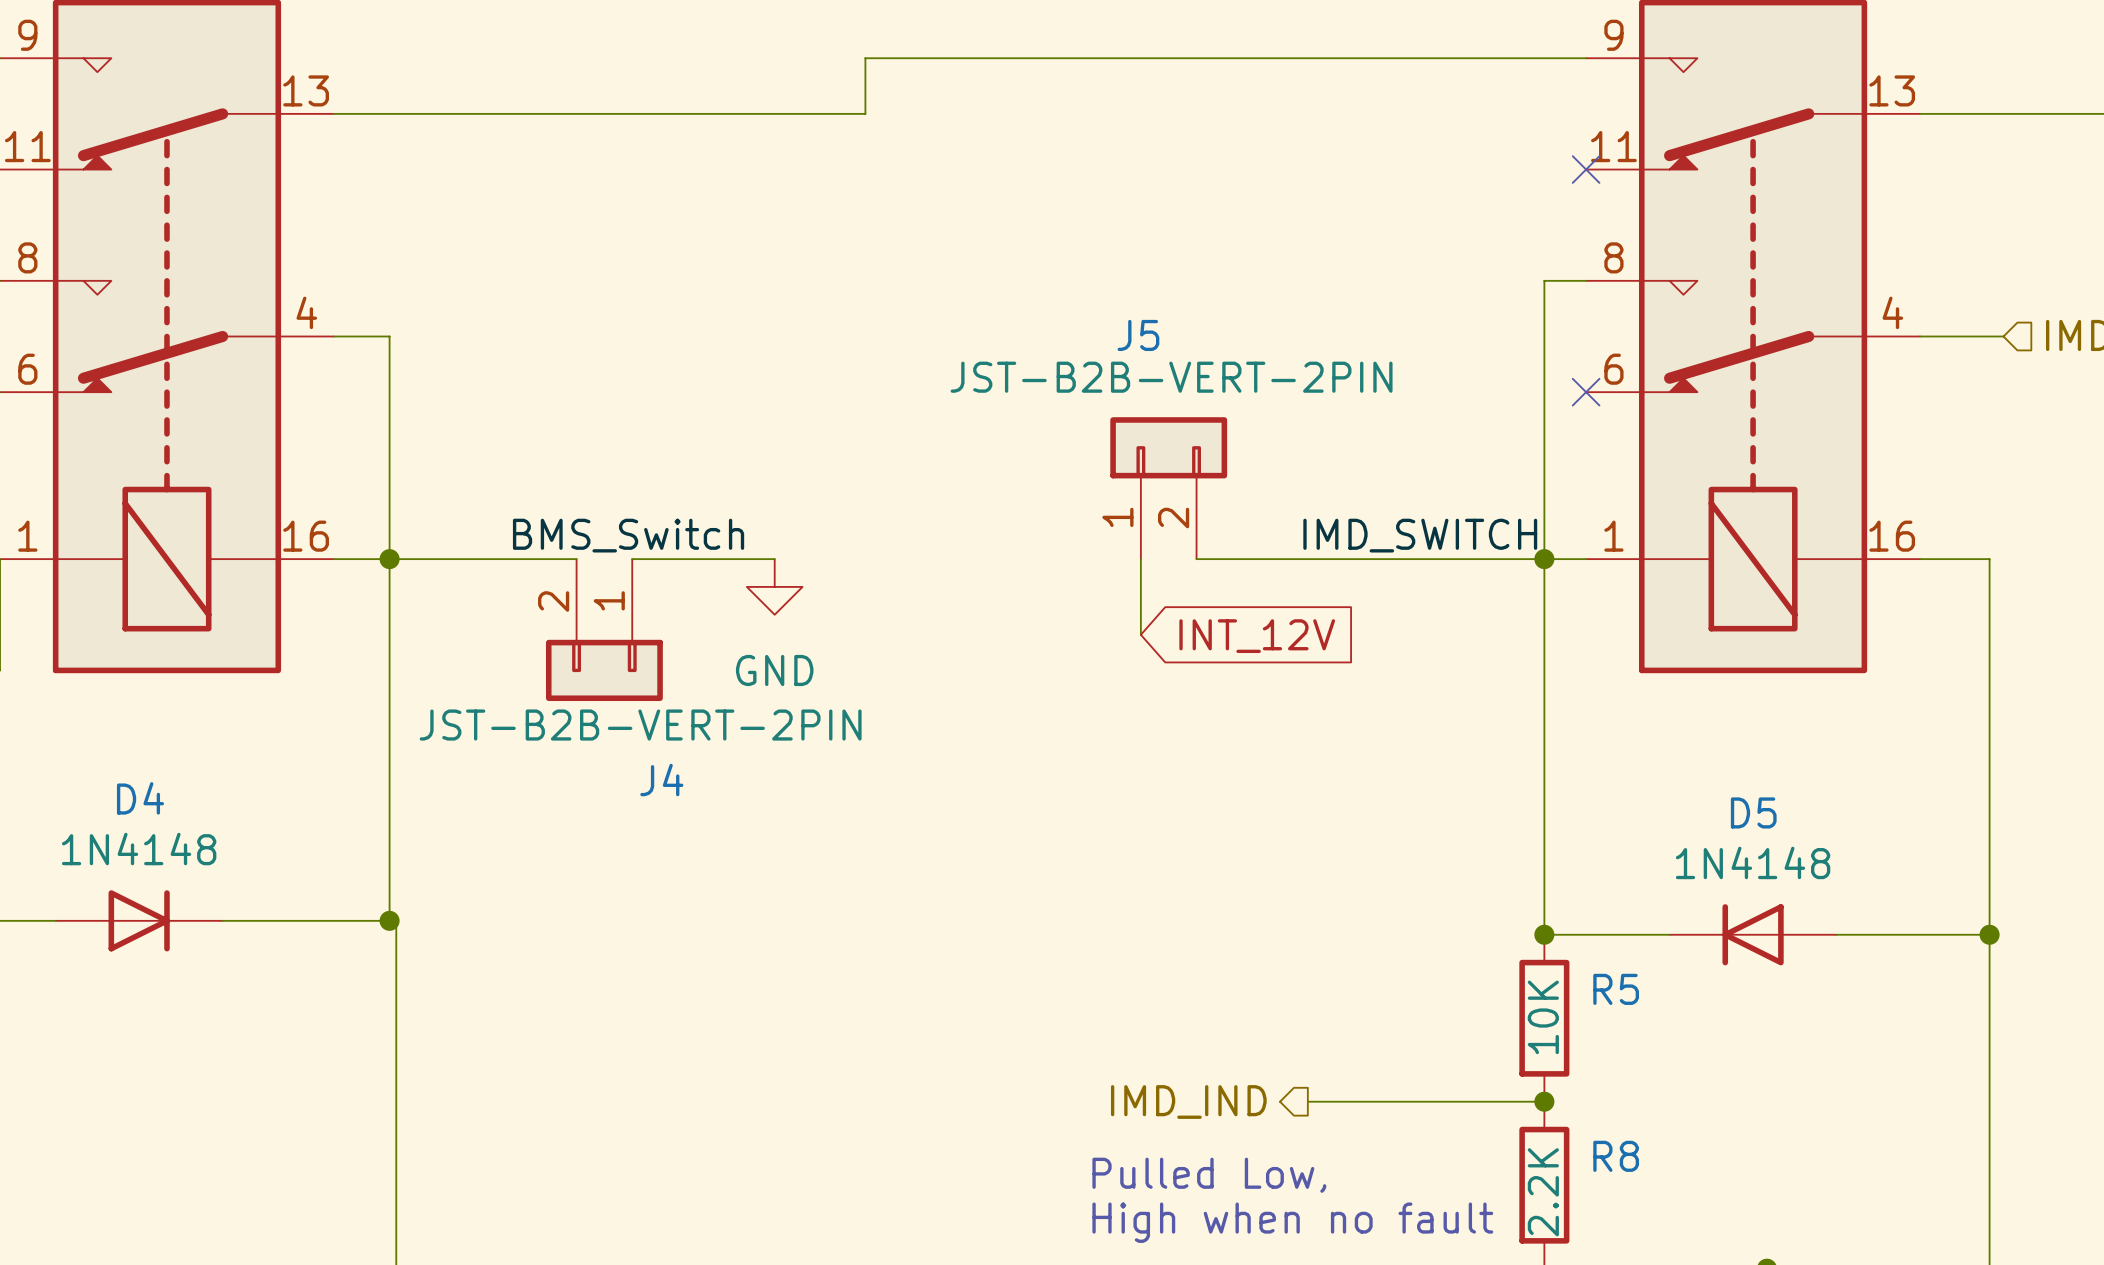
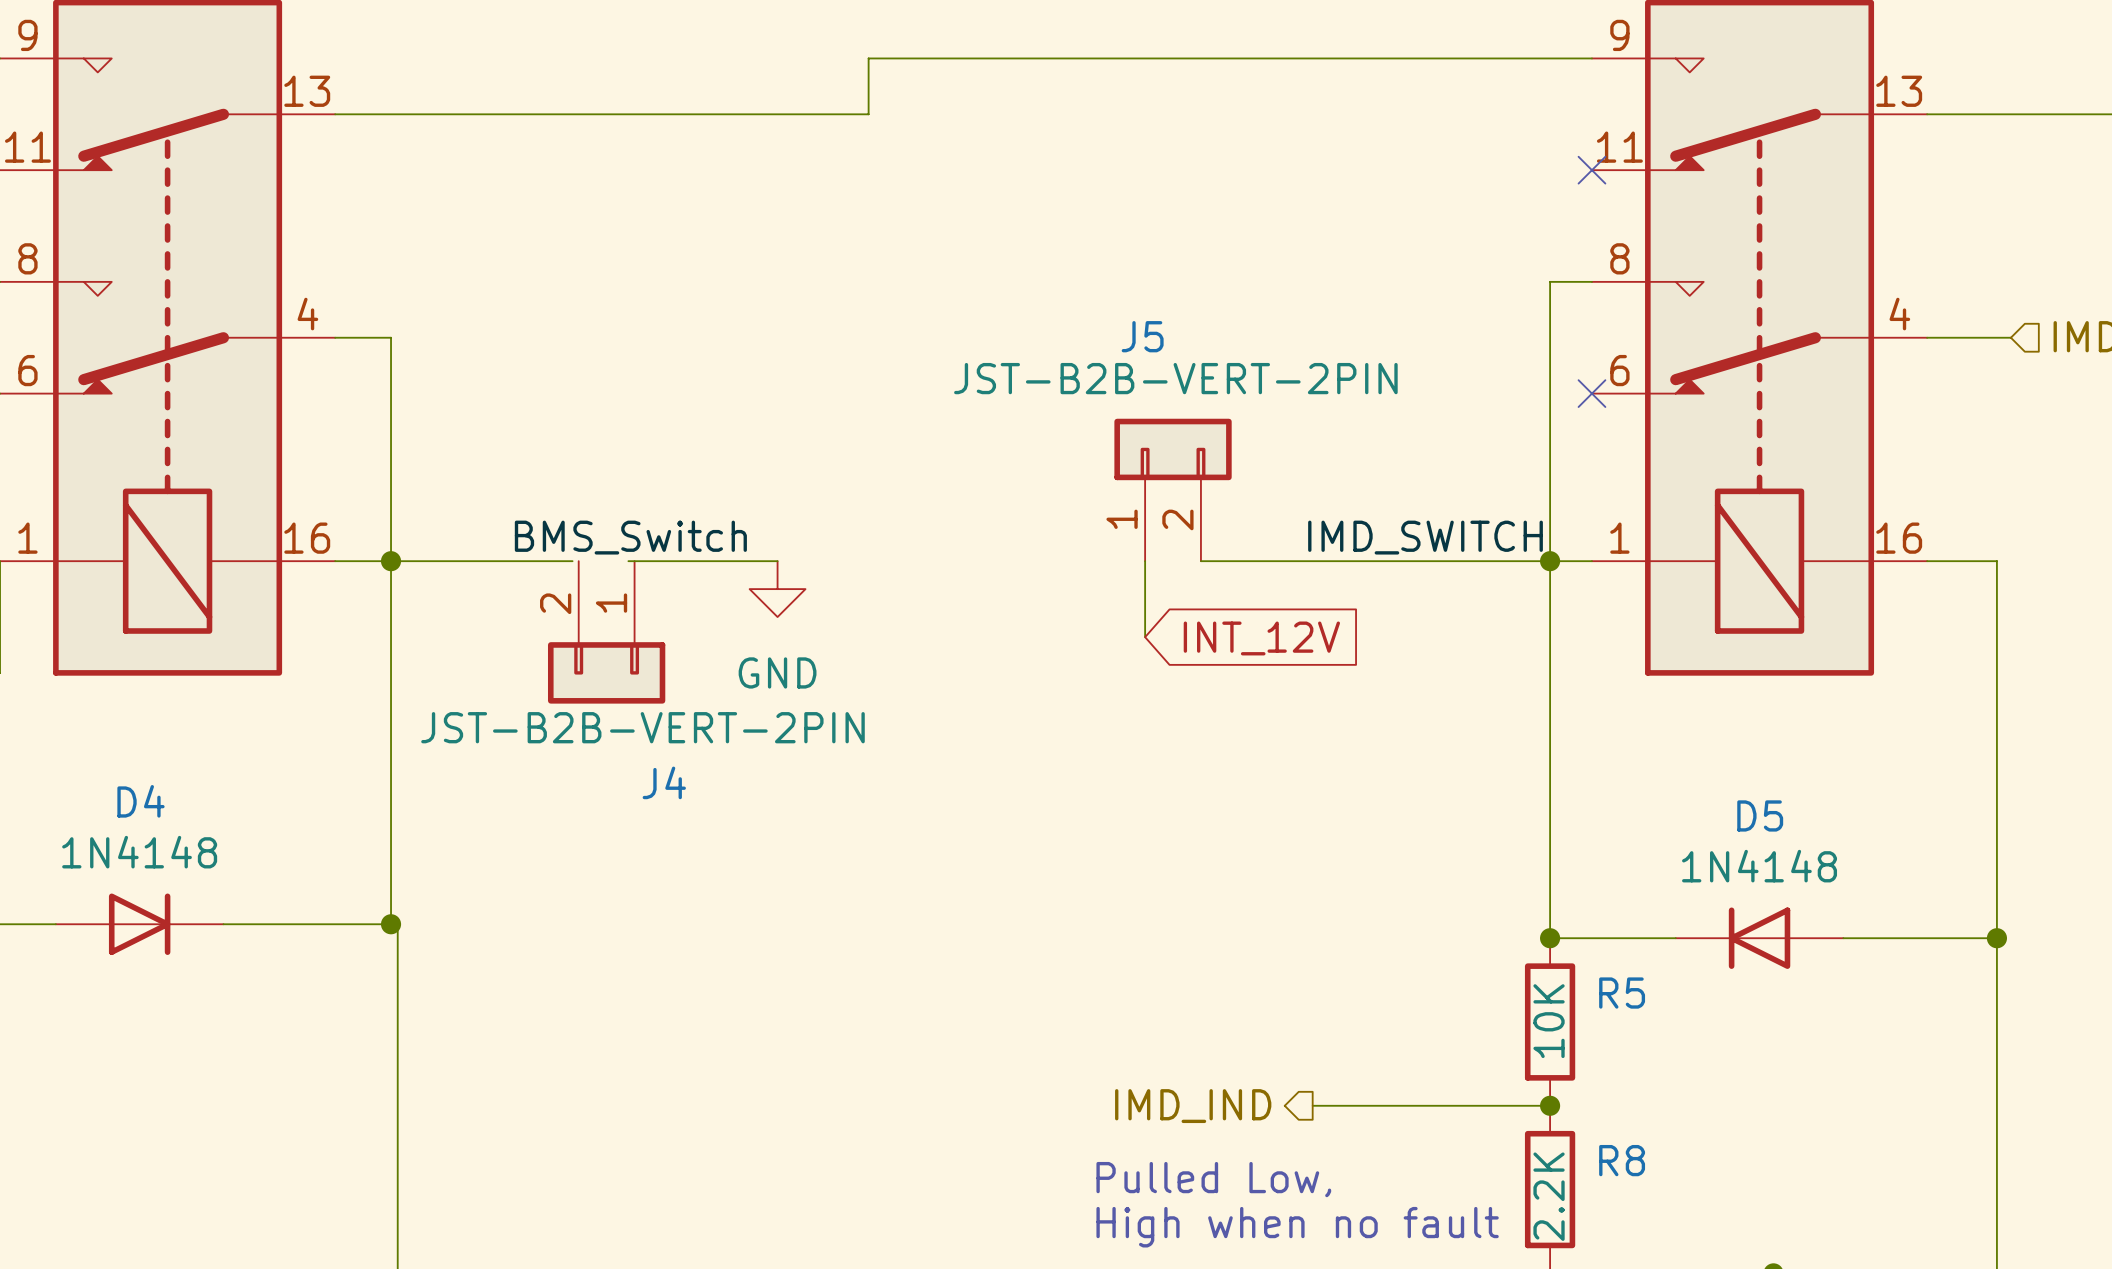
wire: (570, 559) (576, 559) -> (628, 561) (634, 561)

